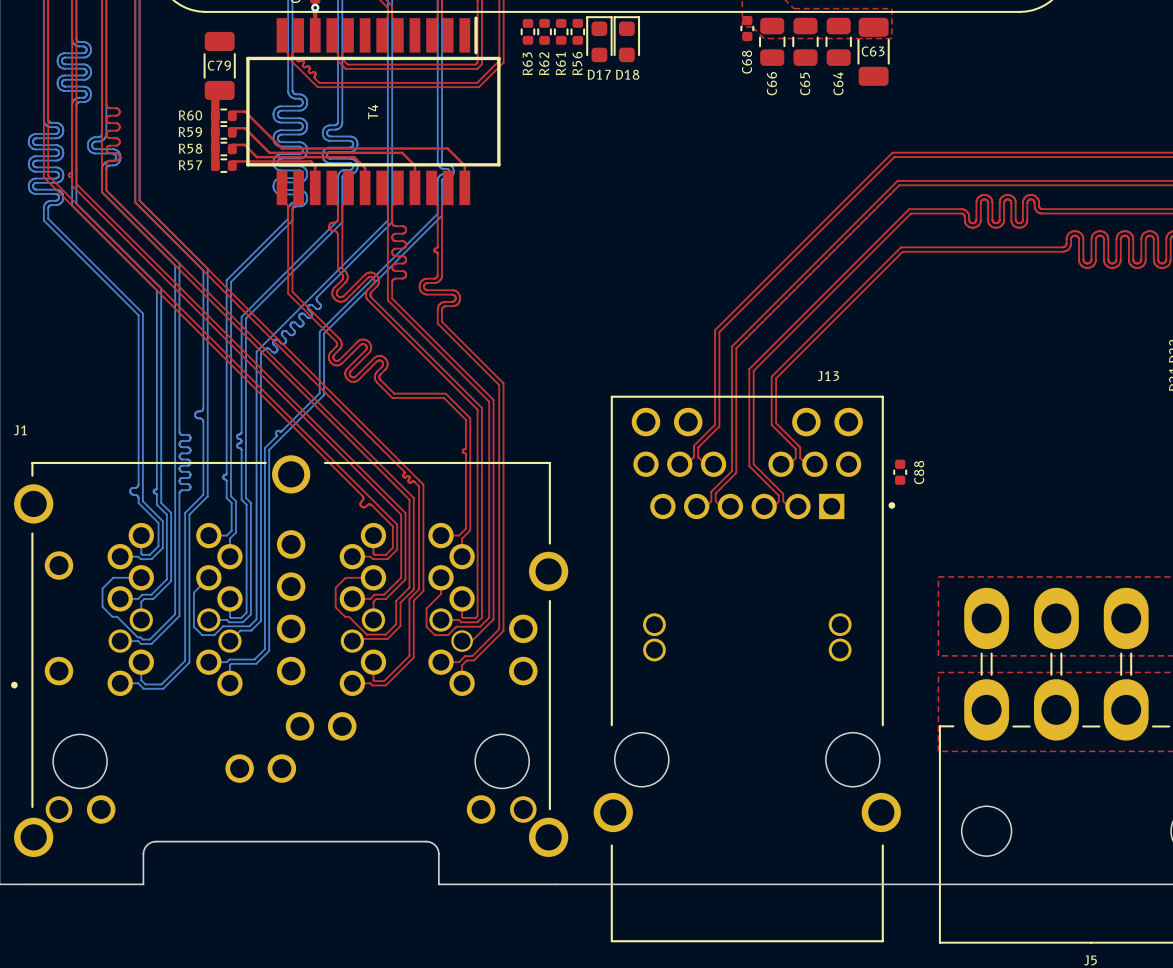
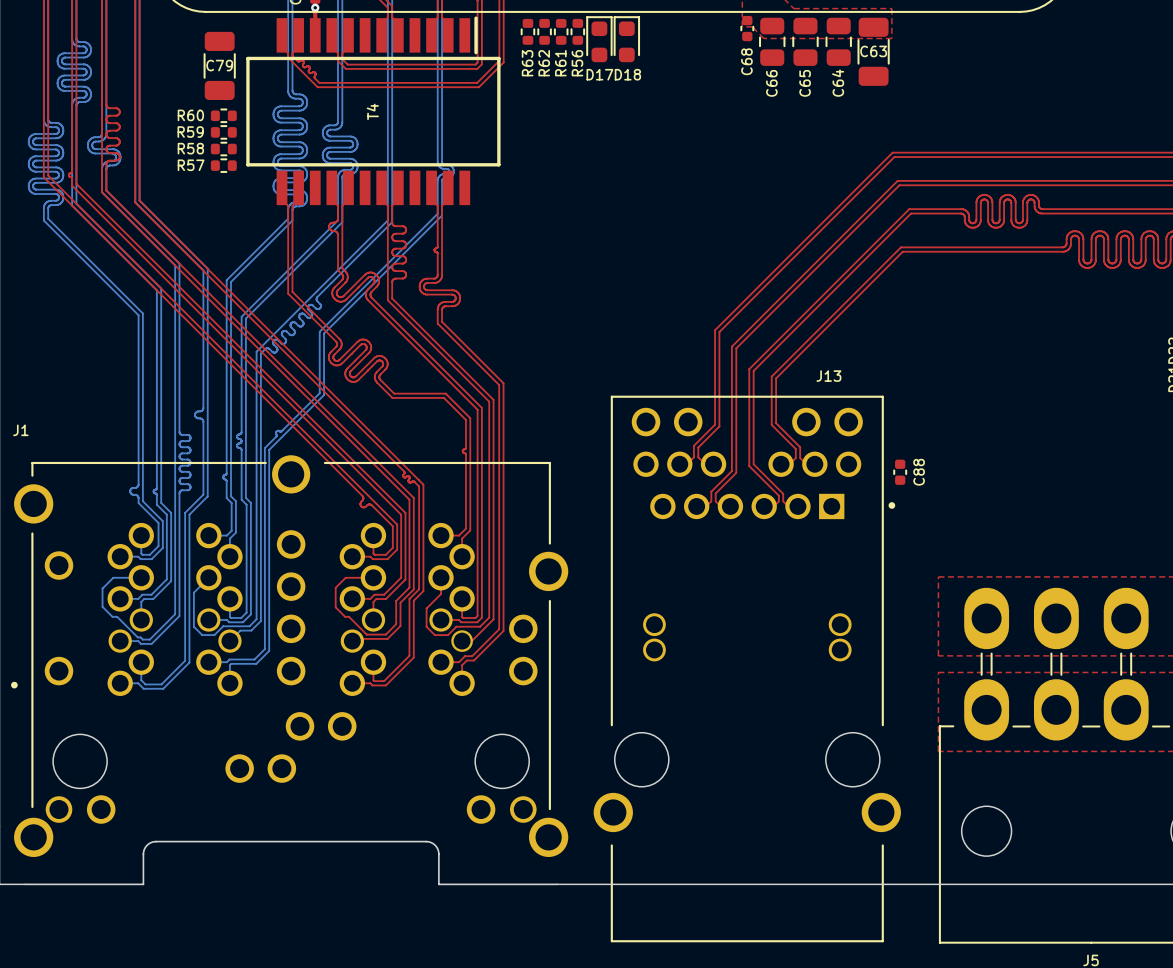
top track: (215, 86) (215, 161) -> none
top track: (232, 111) (245, 111) (282, 148) (447, 148) (464, 165) (464, 187) -> none
top track: (232, 128) (244, 128) (269, 152) (402, 152) (414, 165) (414, 187) -> none
top track: (232, 144) (244, 144) (256, 157) (354, 157) (365, 168) (365, 187) -> none
top track: (232, 161) (311, 161) (315, 165) (315, 187) -> none

